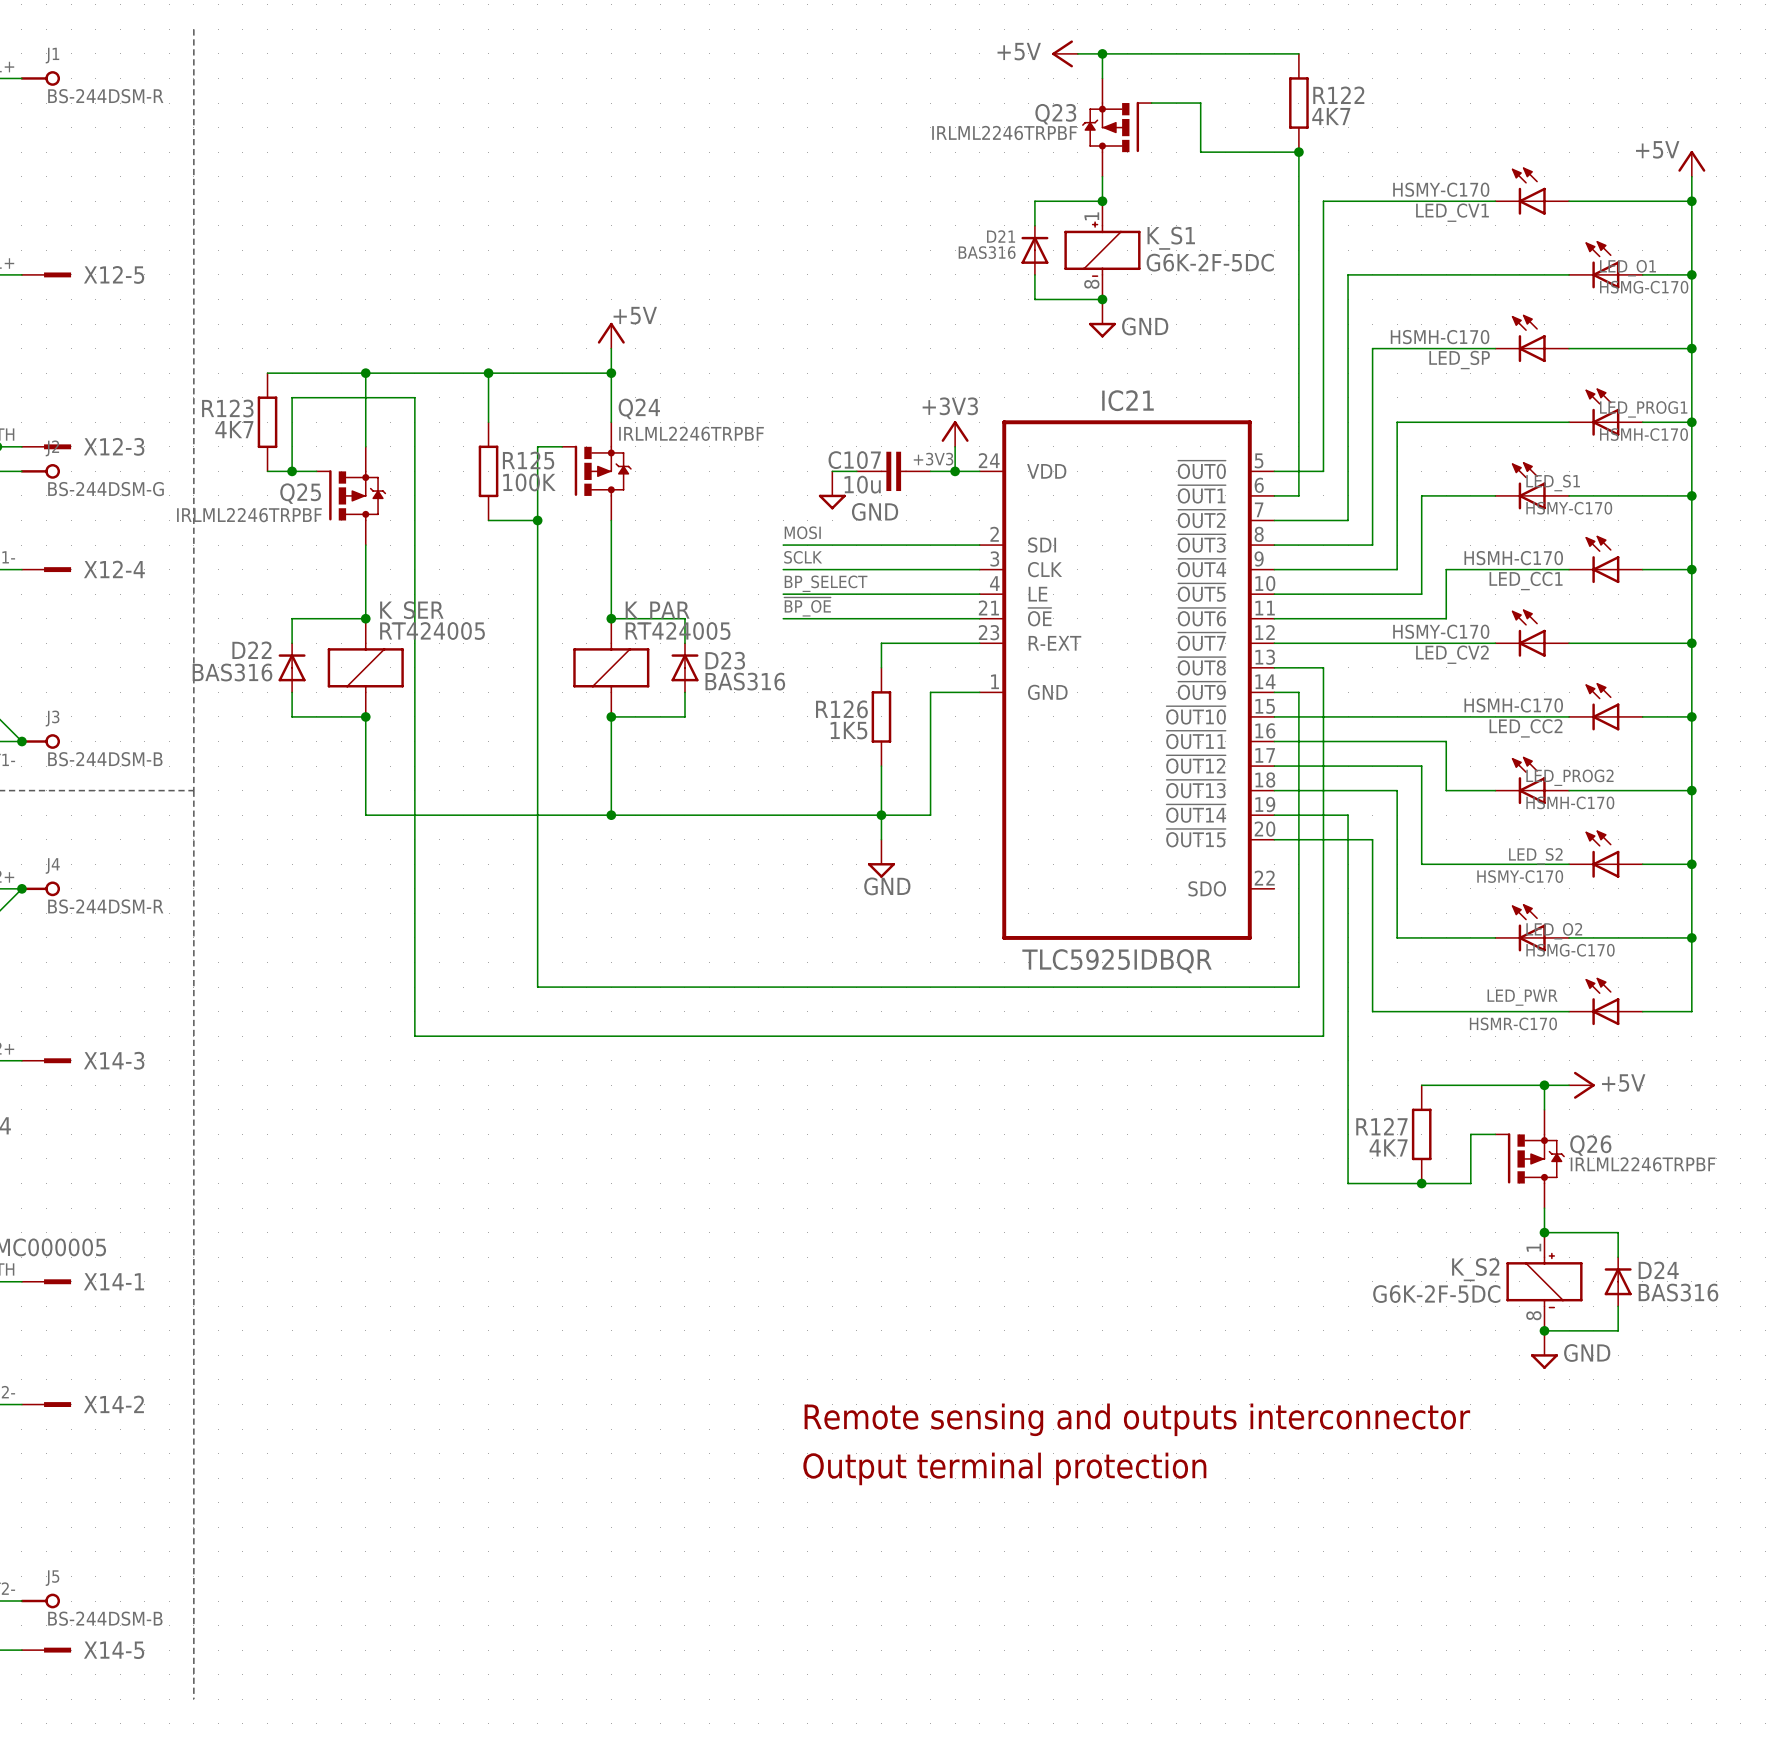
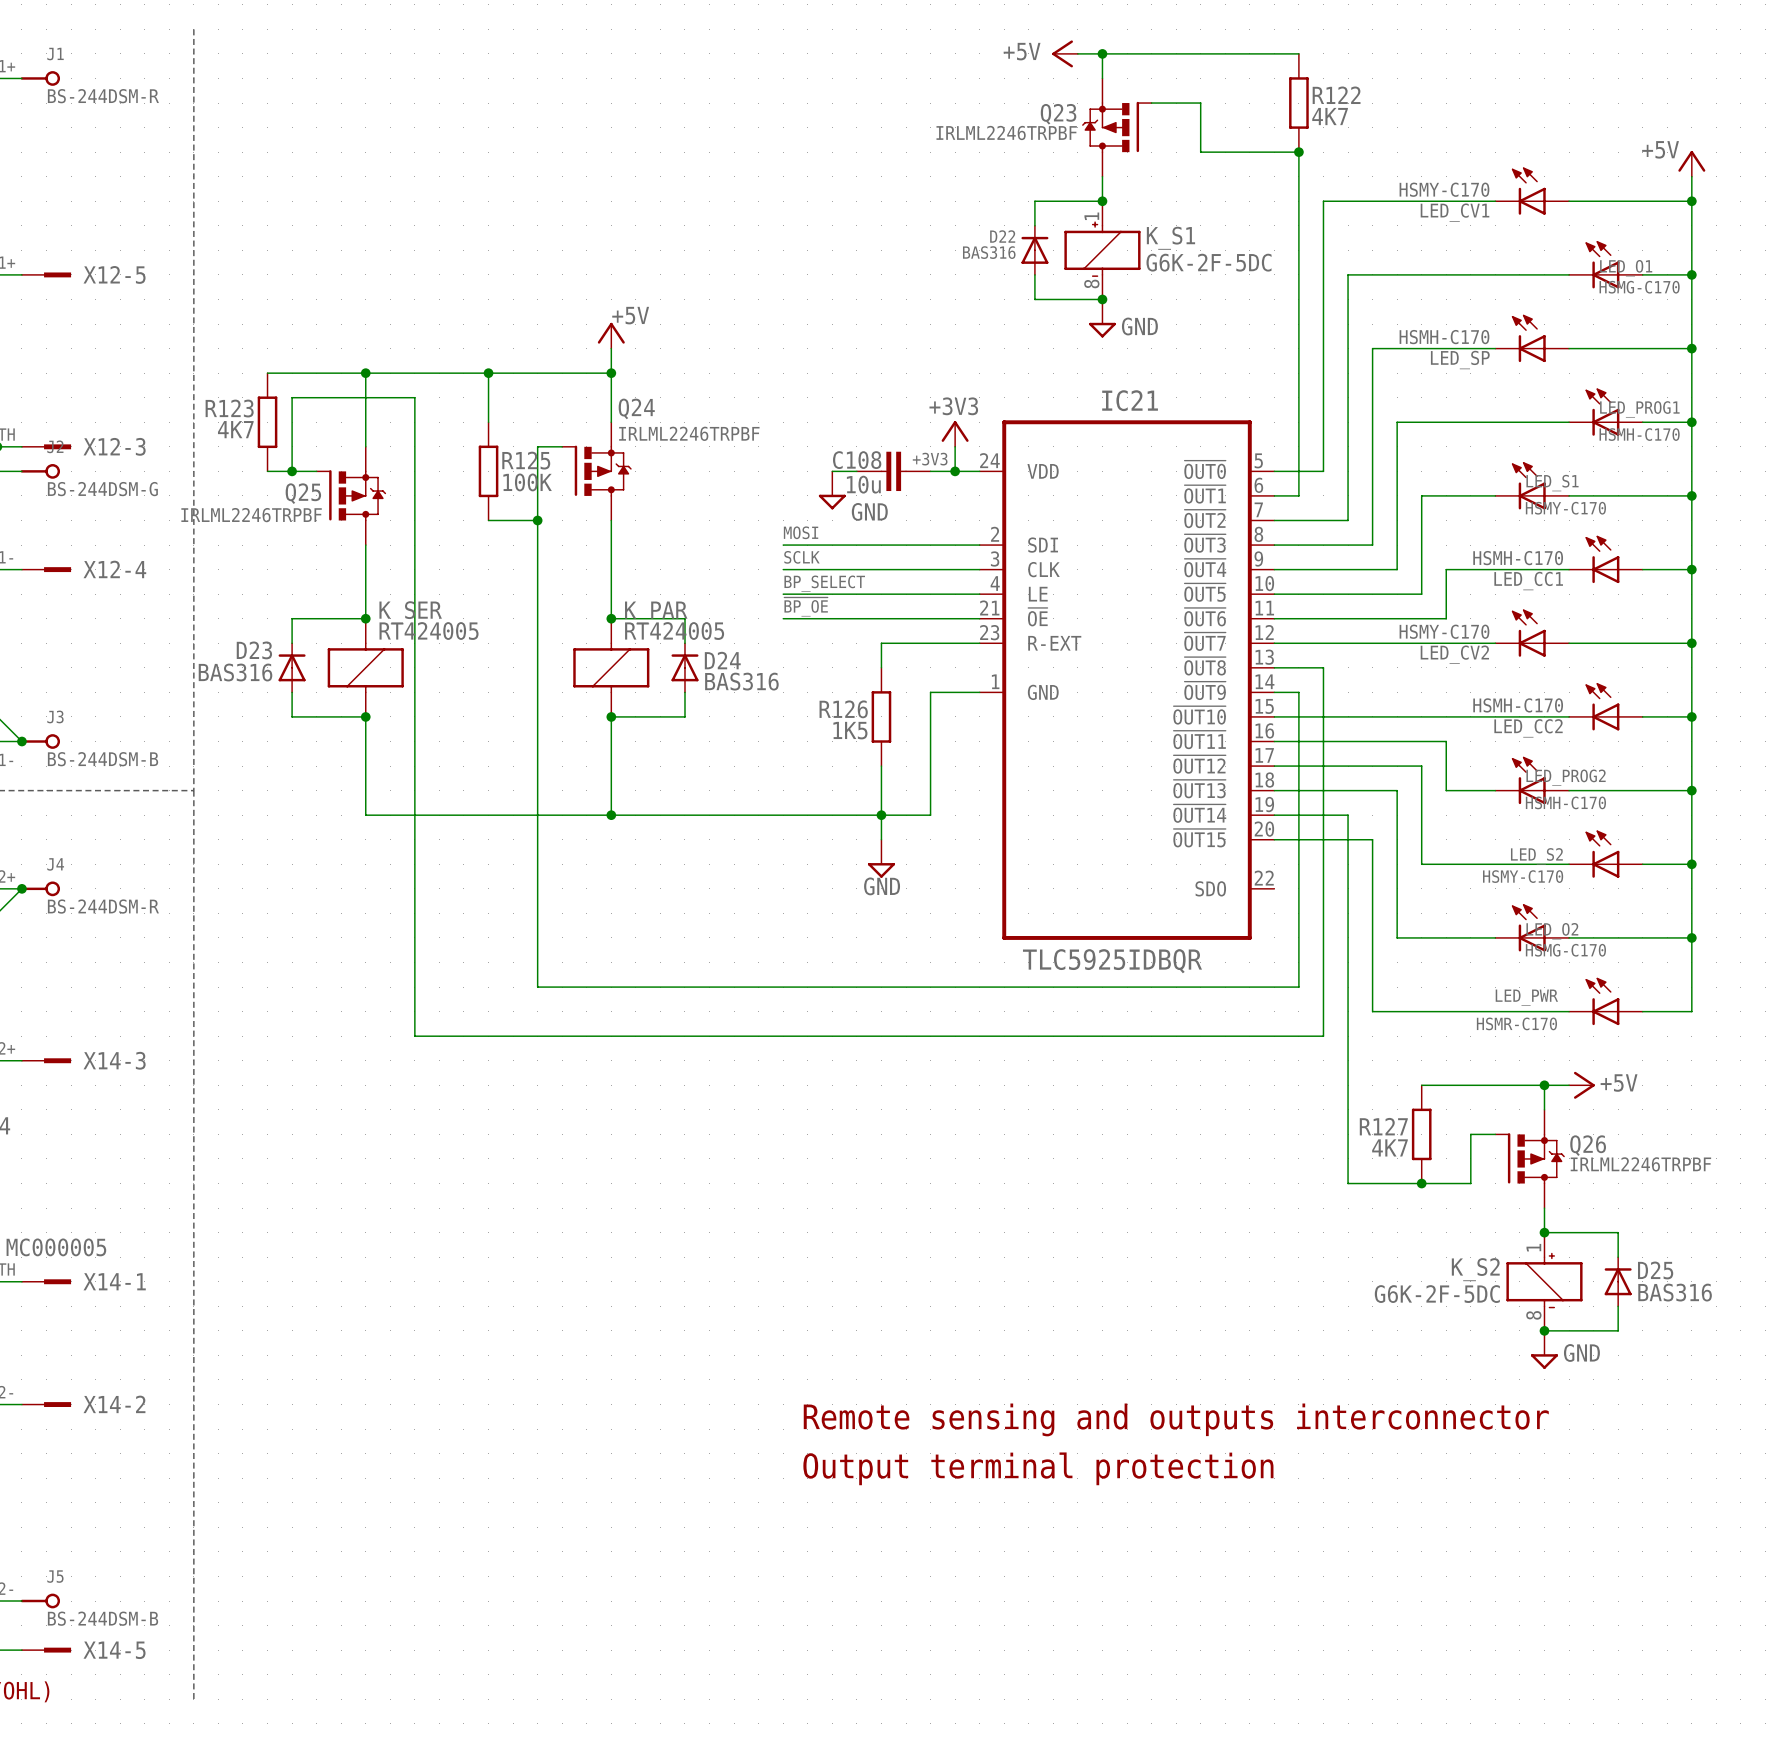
D21 name: D21 (1001, 236) -> D22 (1002, 236)
C107 name: C107 (854, 460) -> C108 (857, 460)
D22 name: D22 (251, 650) -> D23 (254, 650)
D23 name: D23 (725, 660) -> D24 (722, 660)
D24 name: D24 (1658, 1270) -> D25 (1655, 1270)

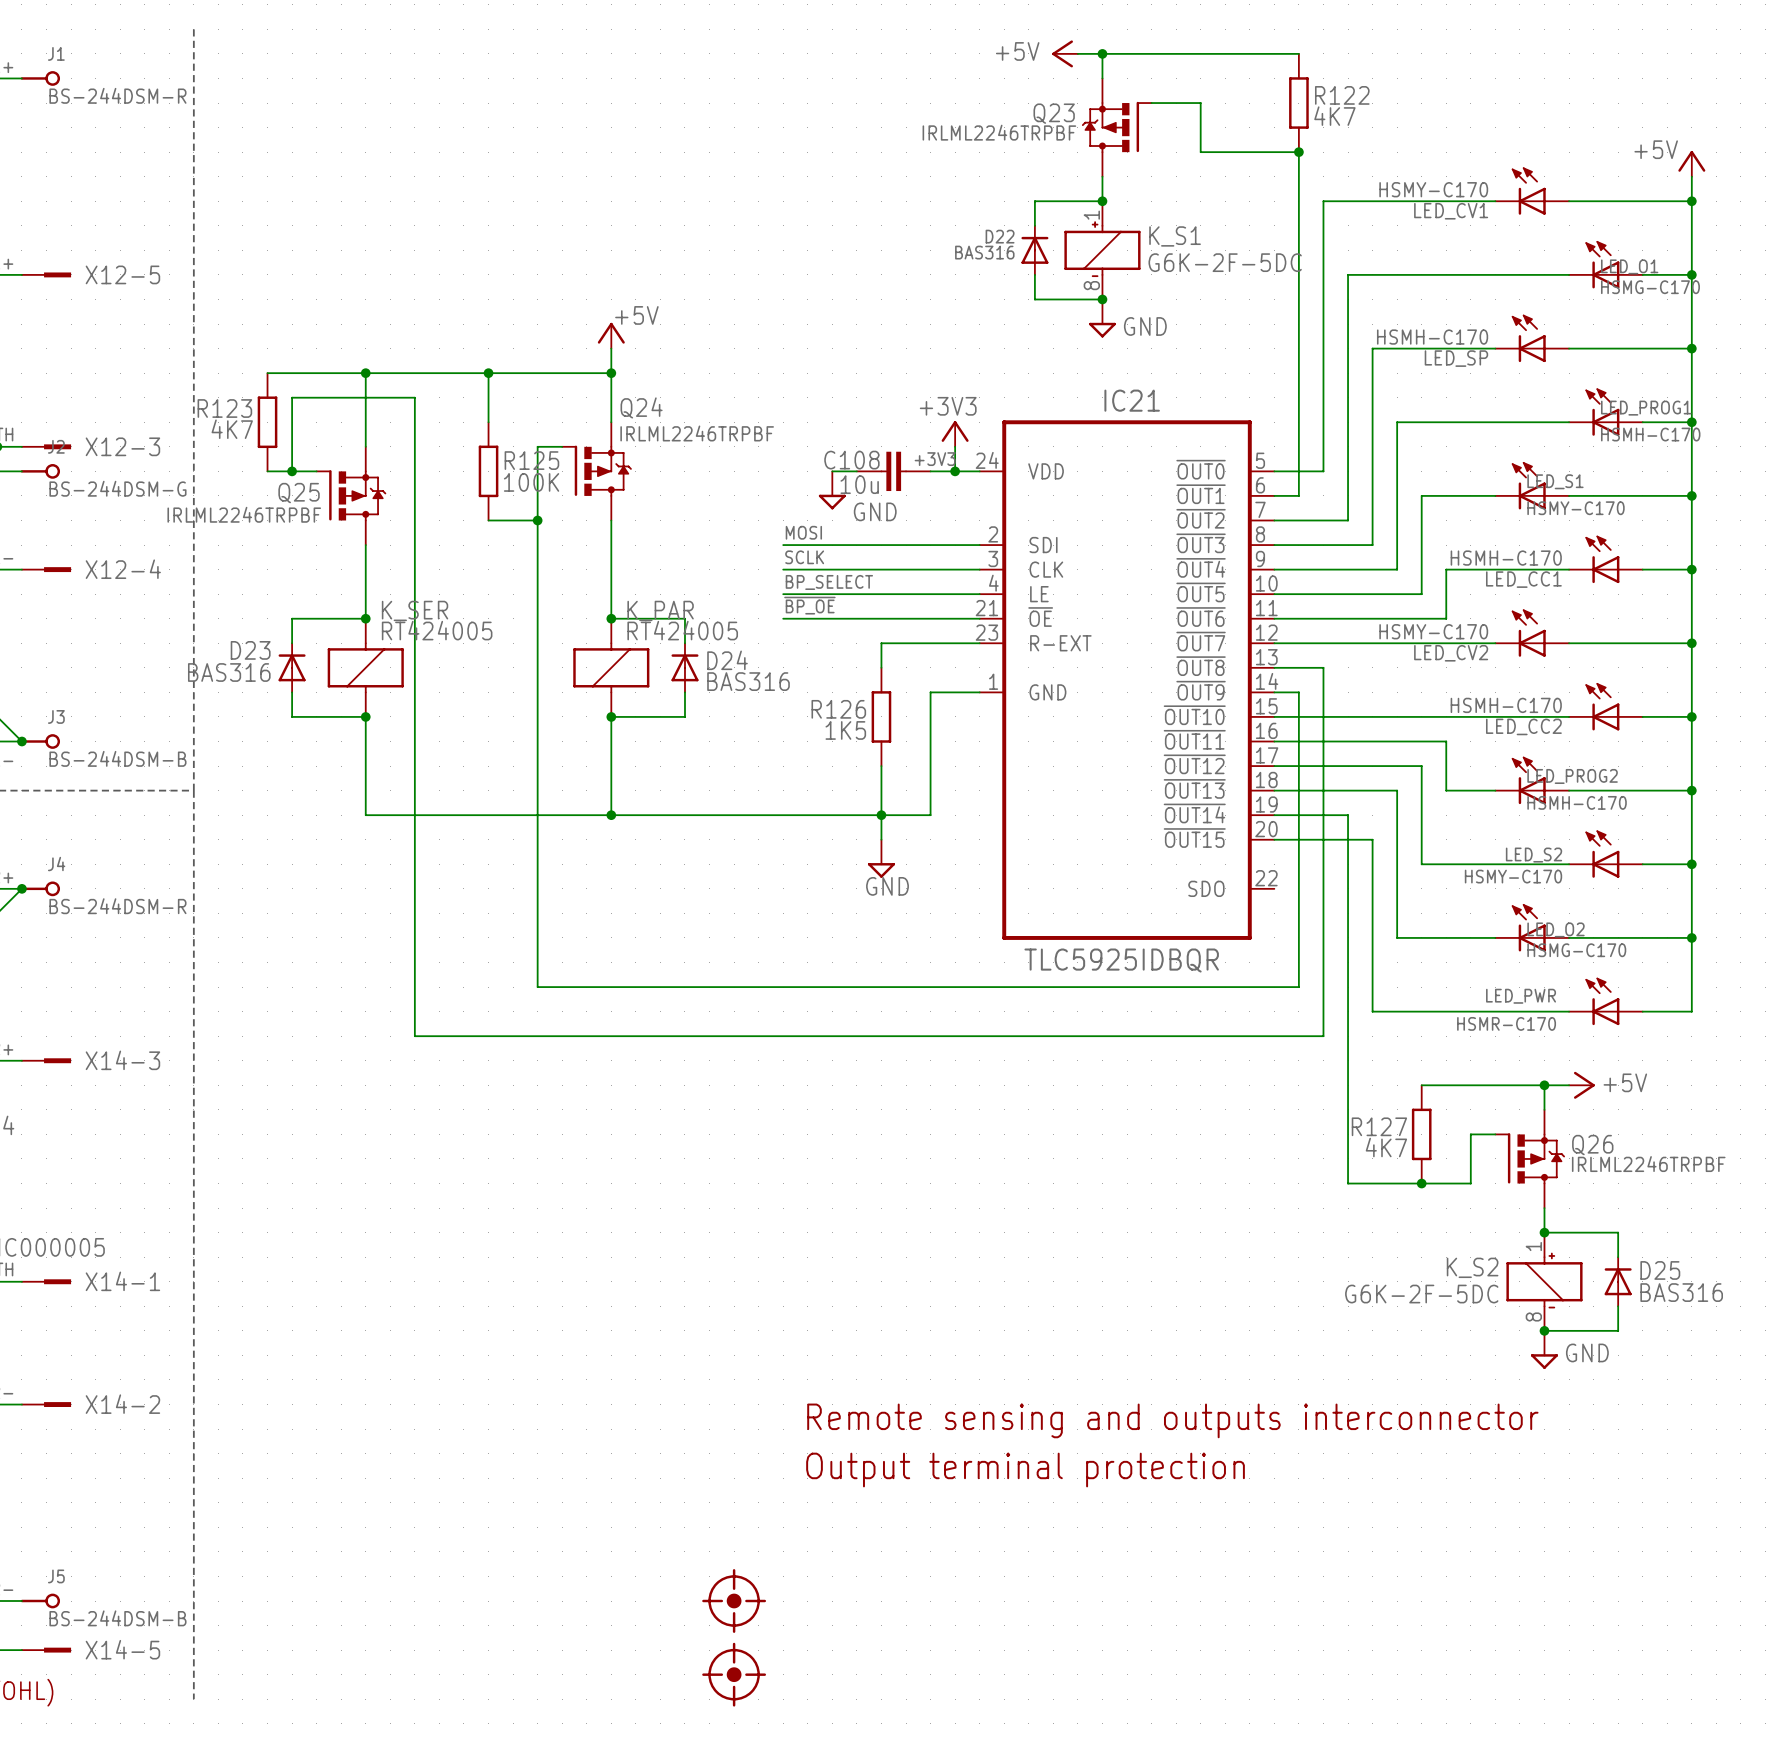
part: none -> (734, 1601)
part: none -> (734, 1674)

